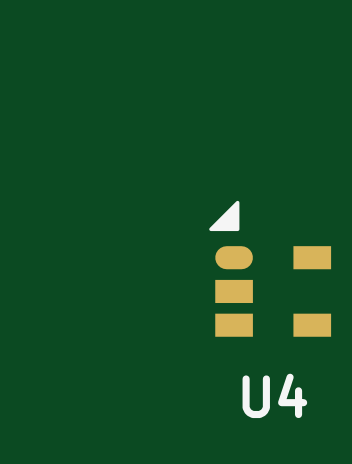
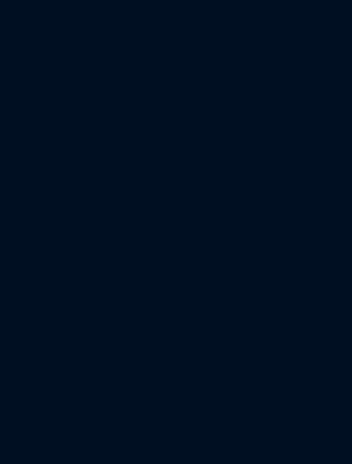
U4: (270, 268) -> none

